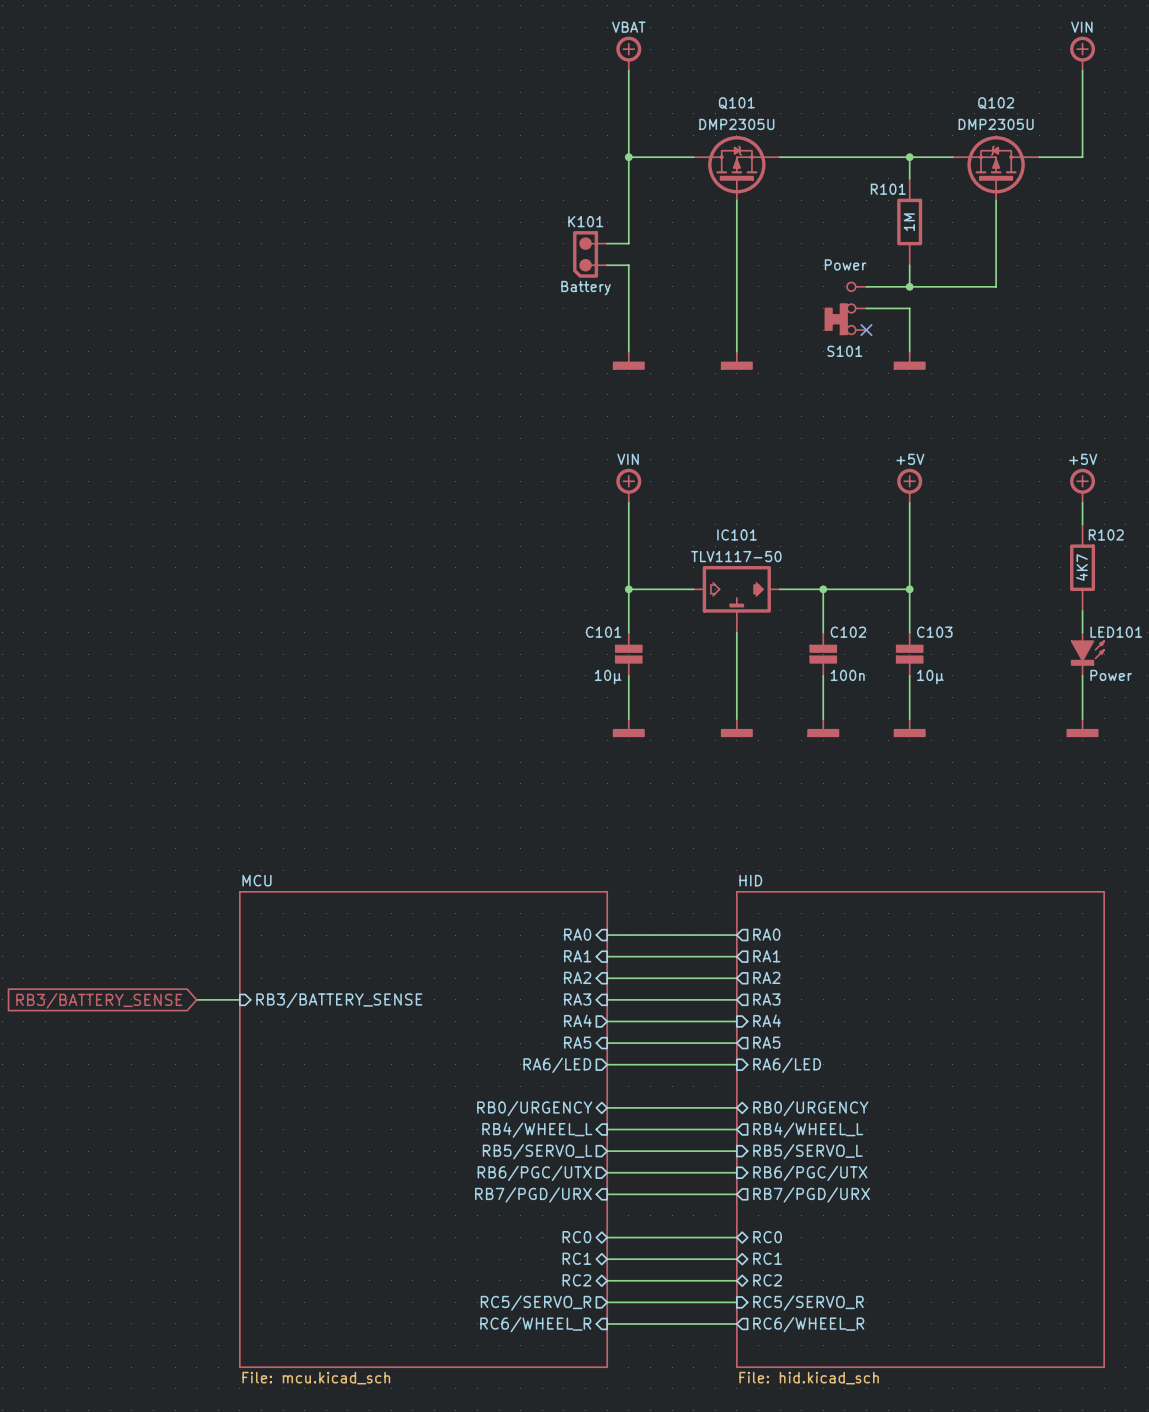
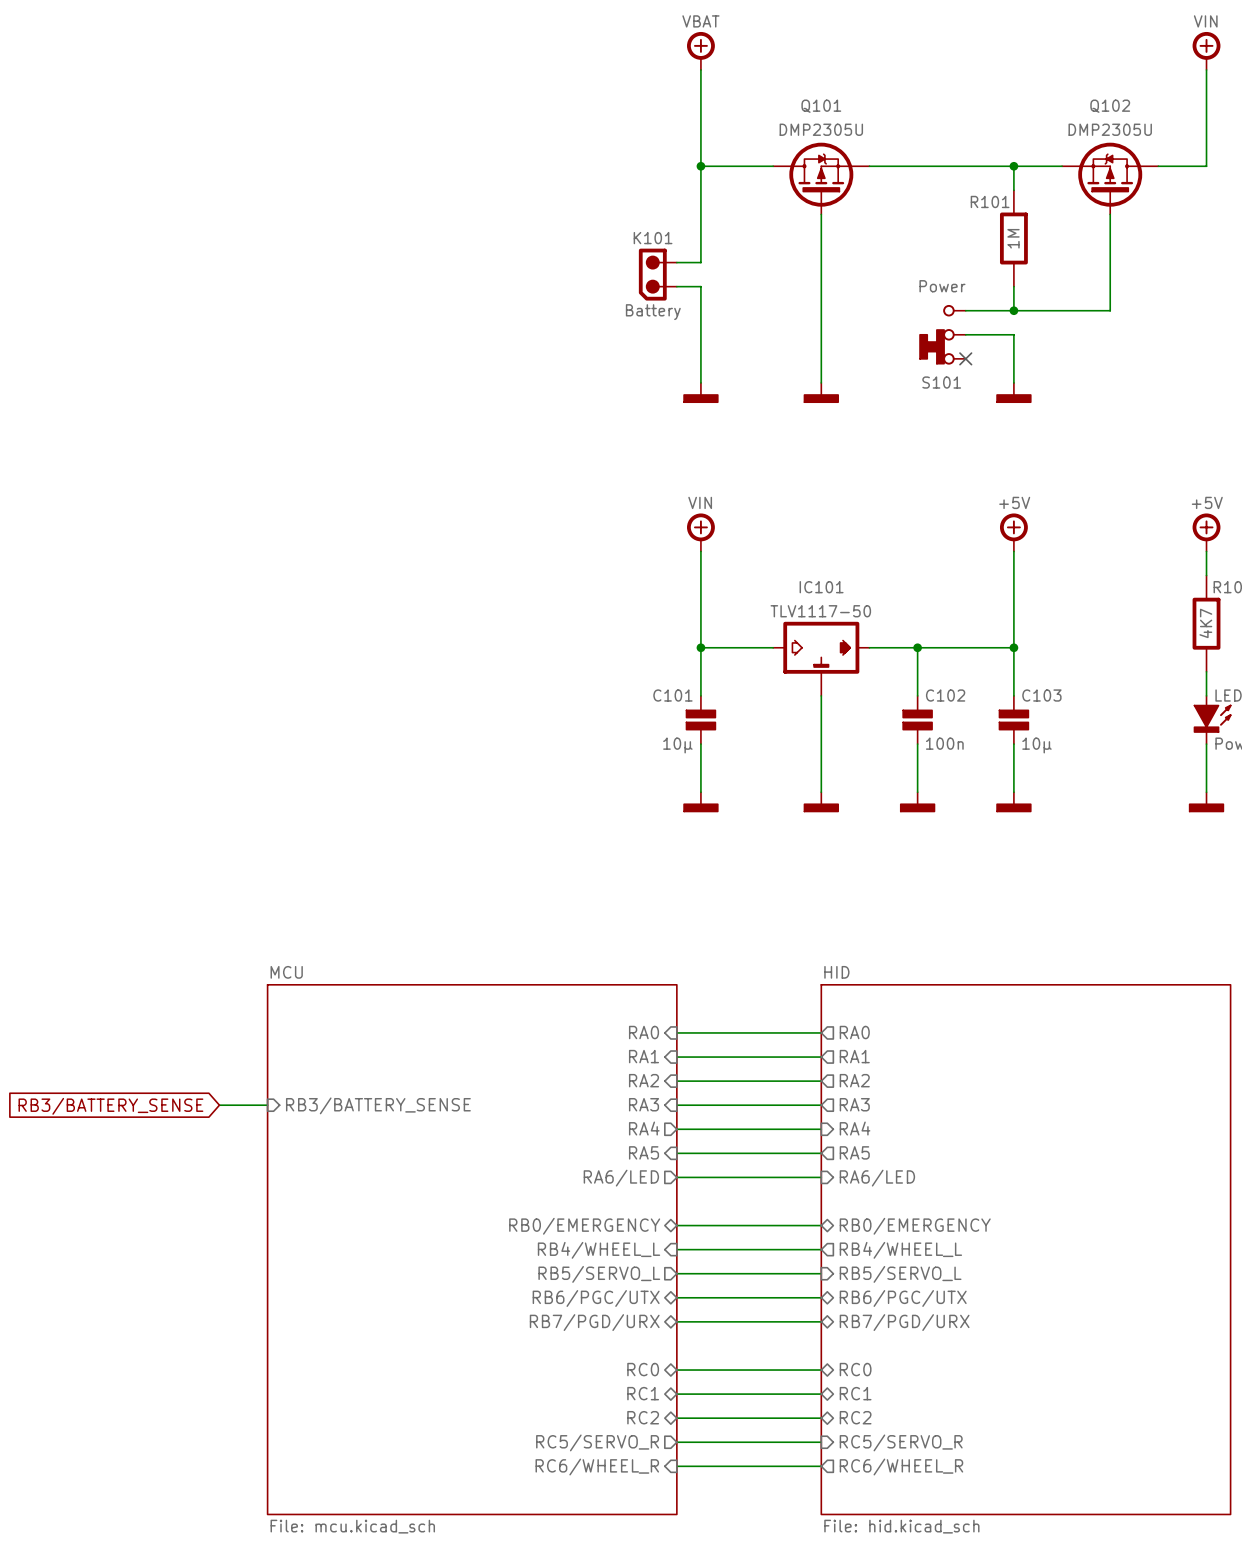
sheet pin: RB0/URGENCY (534, 1108) -> RB0/EMERGENCY (584, 1226)
sheet pin: RB0/URGENCY (810, 1108) -> RB0/EMERGENCY (915, 1226)
sheet pin shape: output (534, 1173) -> bidirectional (596, 1298)
sheet pin shape: input (810, 1173) -> bidirectional (903, 1298)
sheet pin shape: input (533, 1194) -> bidirectional (594, 1322)
sheet pin shape: output (811, 1194) -> bidirectional (904, 1322)

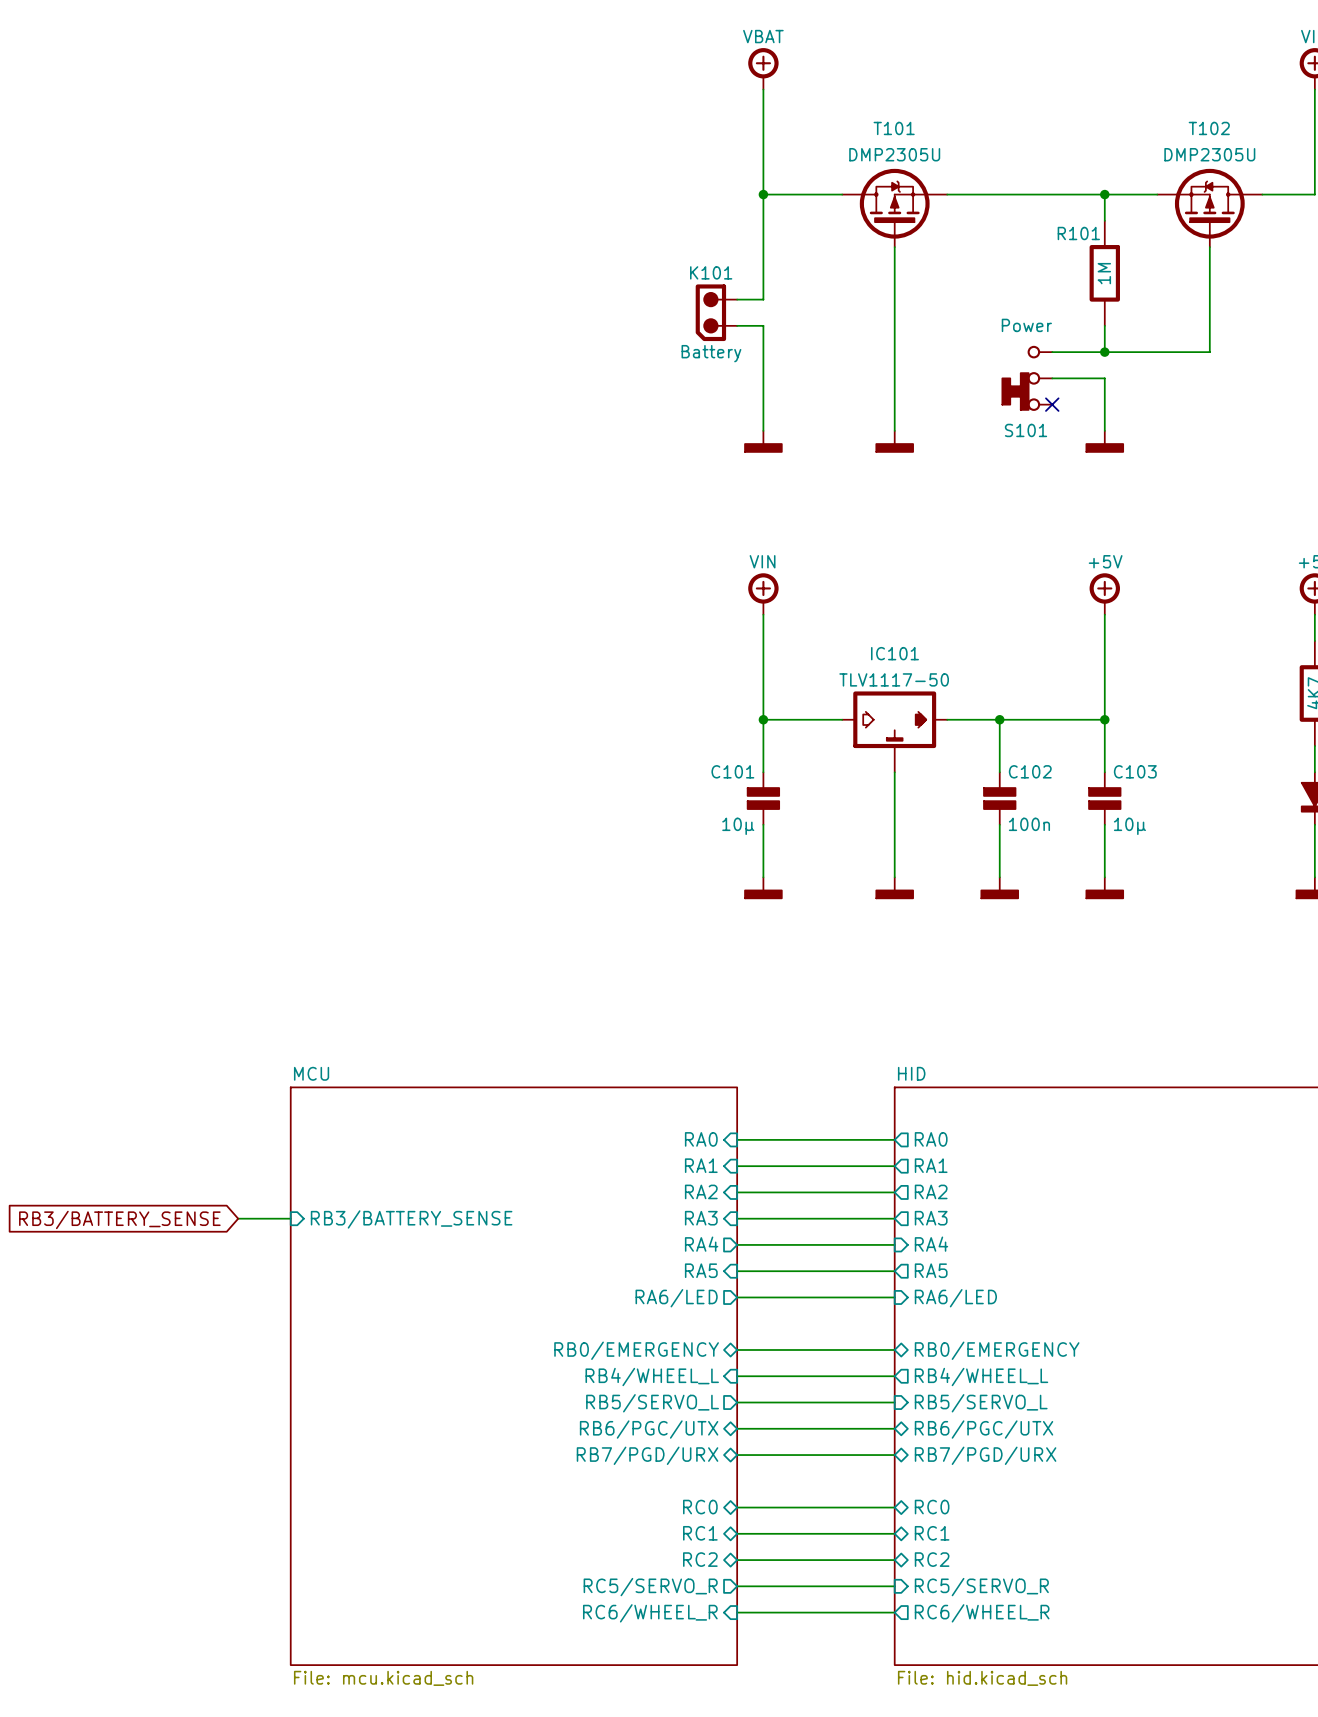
Q101 name: Q101 (821, 106) -> T101 (894, 128)
Q102 name: Q102 (1110, 106) -> T102 (1209, 128)

